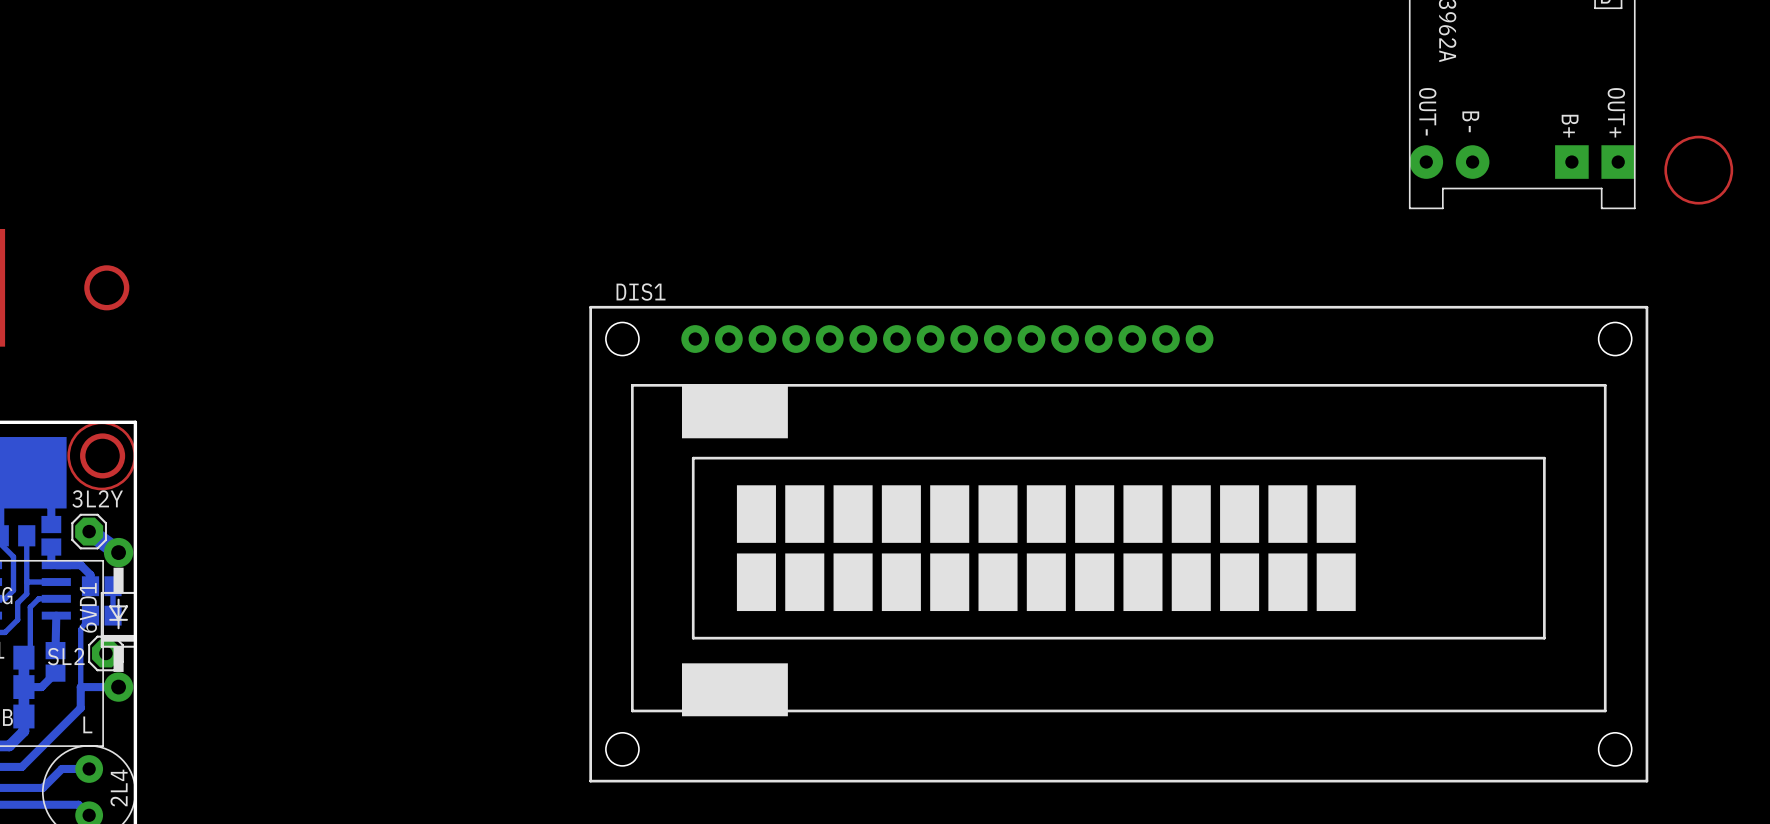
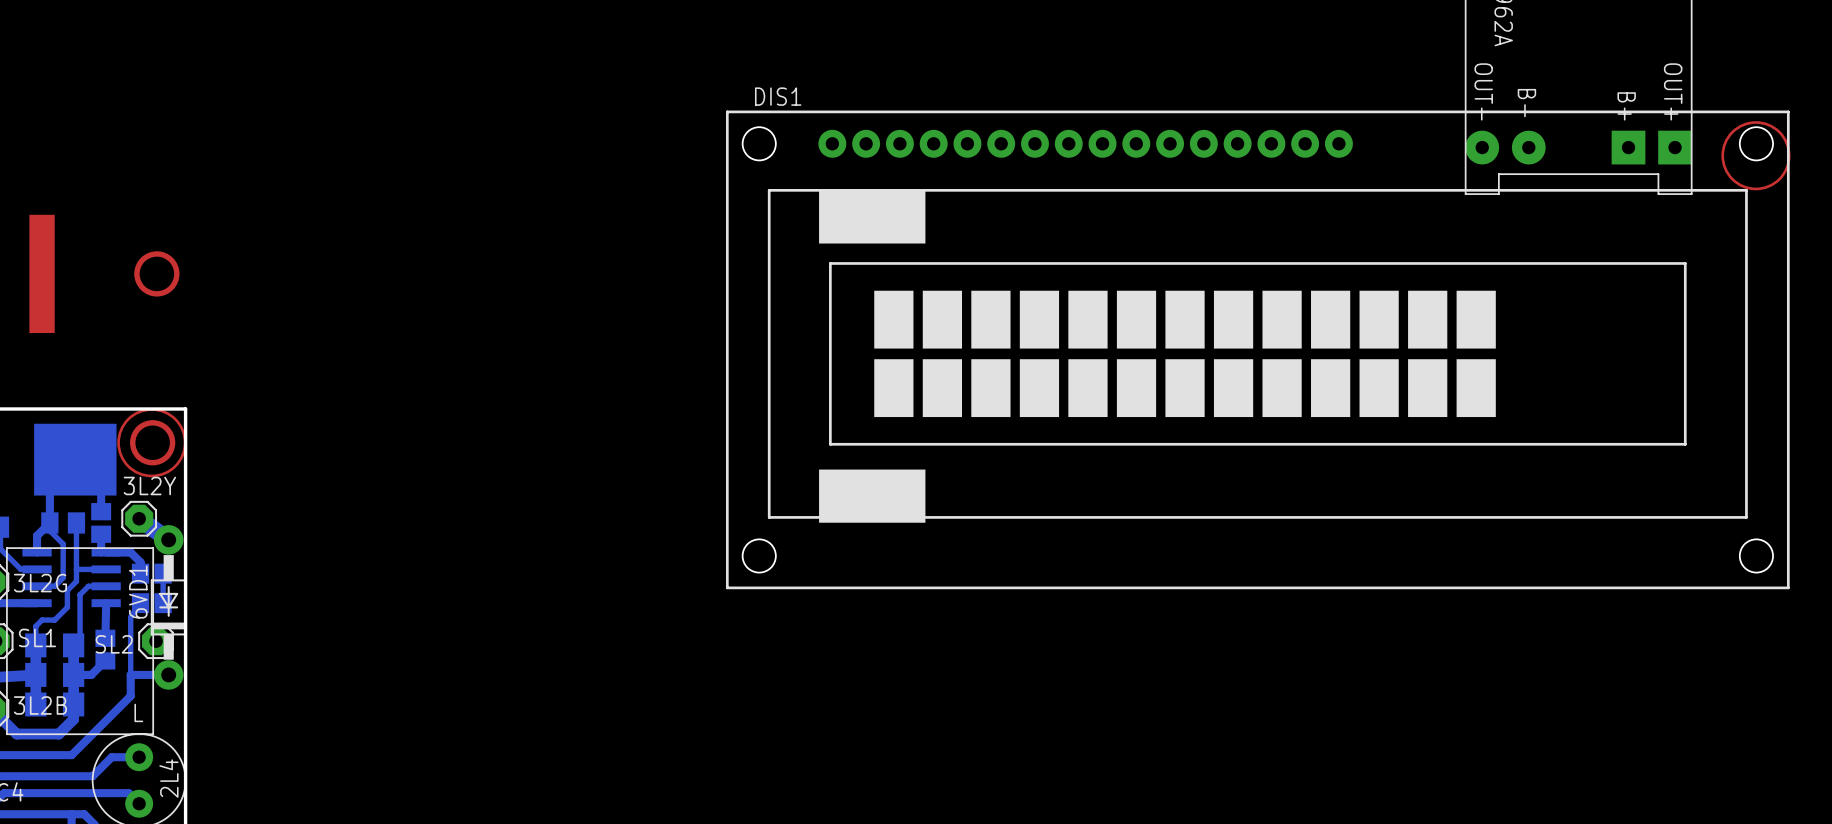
DIS1 position: (1118, 544) -> (1257, 349)

